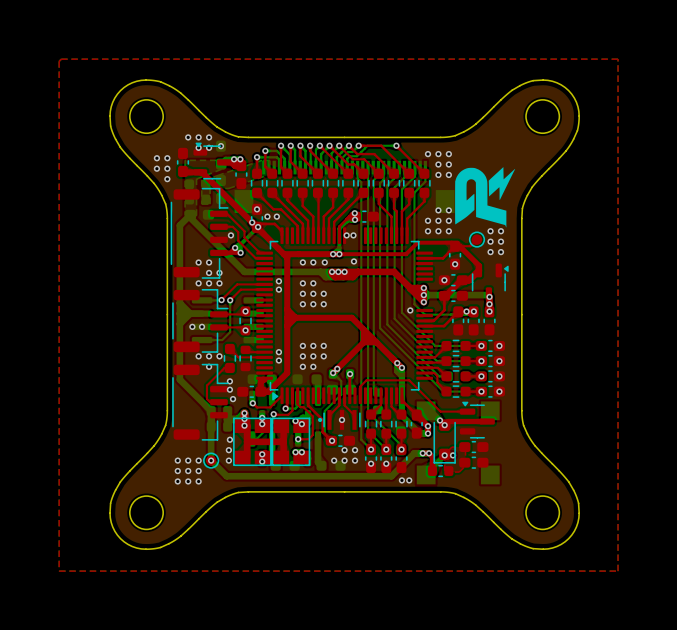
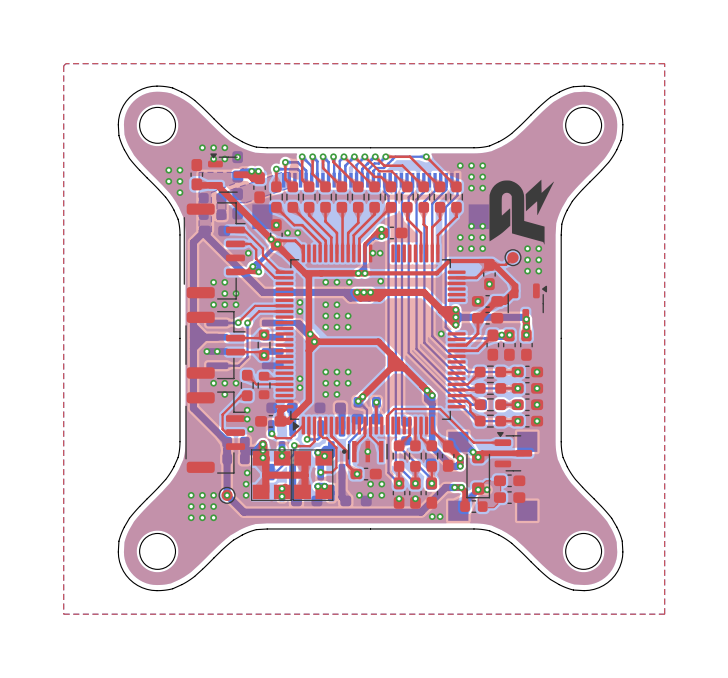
bottom track: none -> (272, 323) (299, 323) (314, 338) (314, 341) (295, 323)
via: none -> (310, 334)
via: none -> (314, 341)

